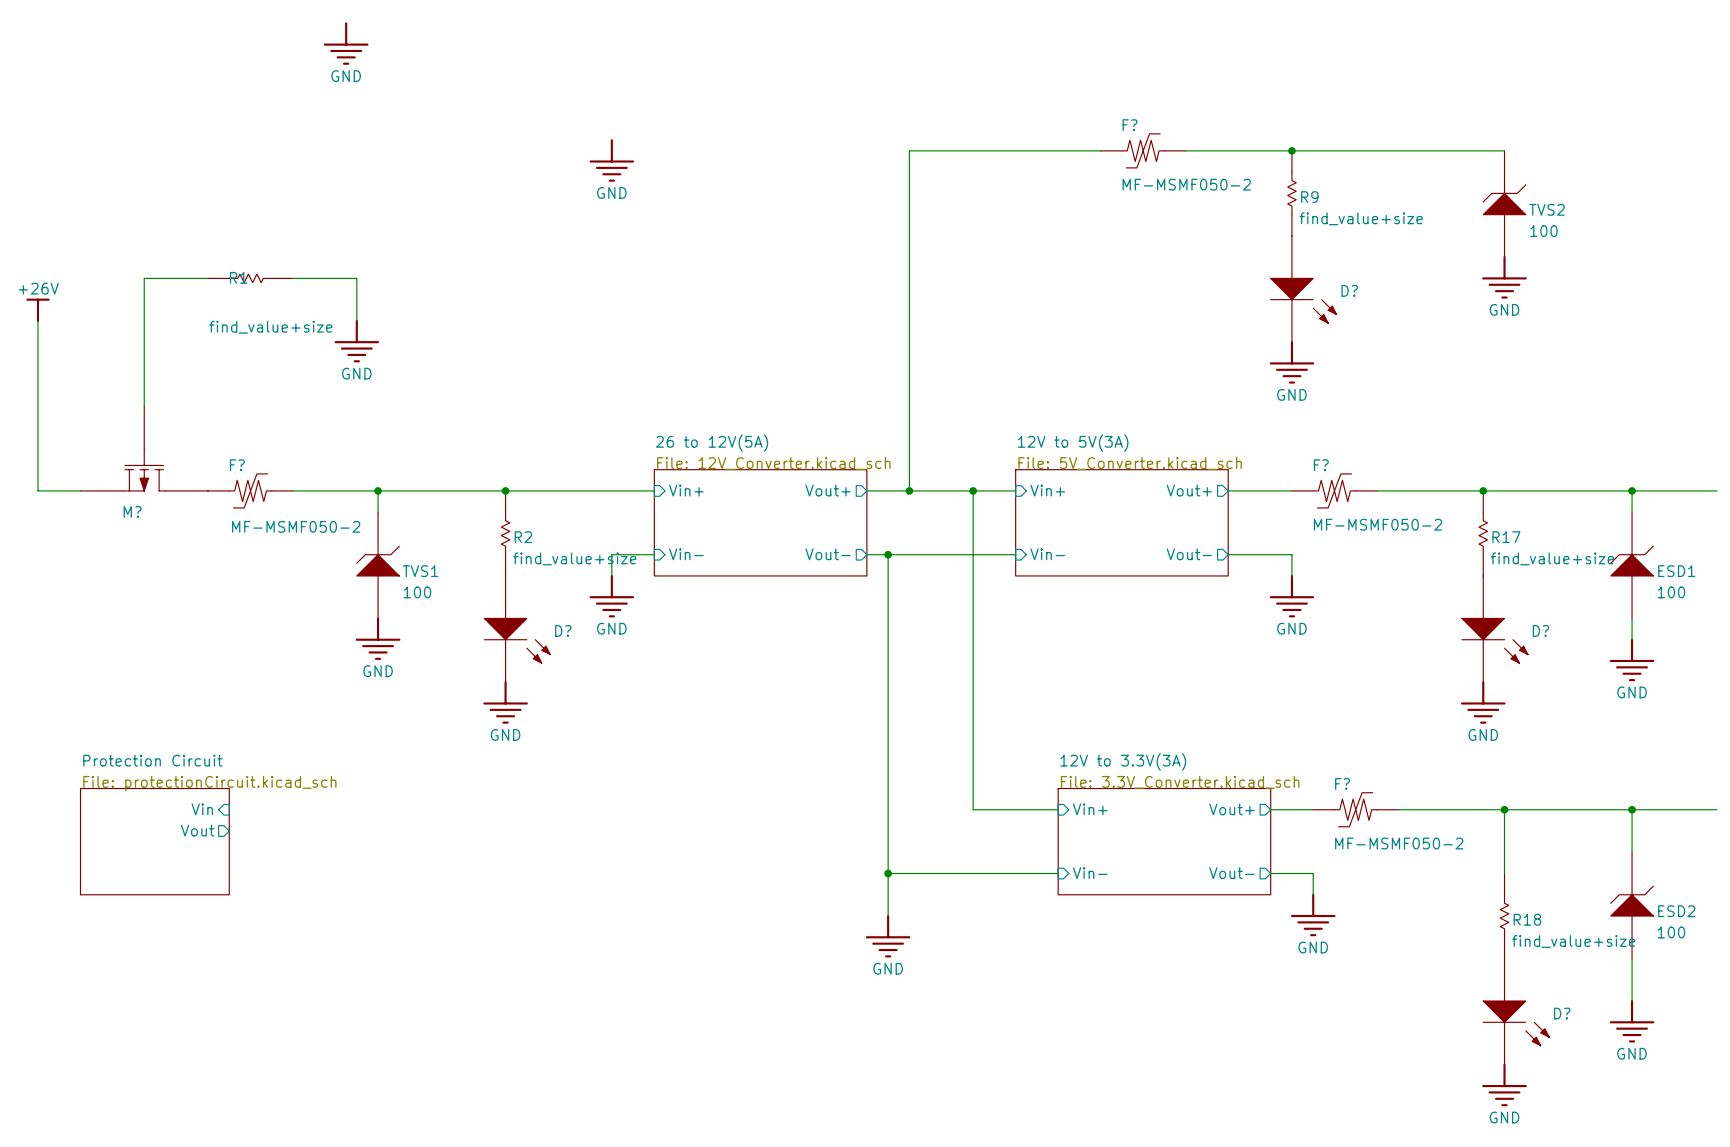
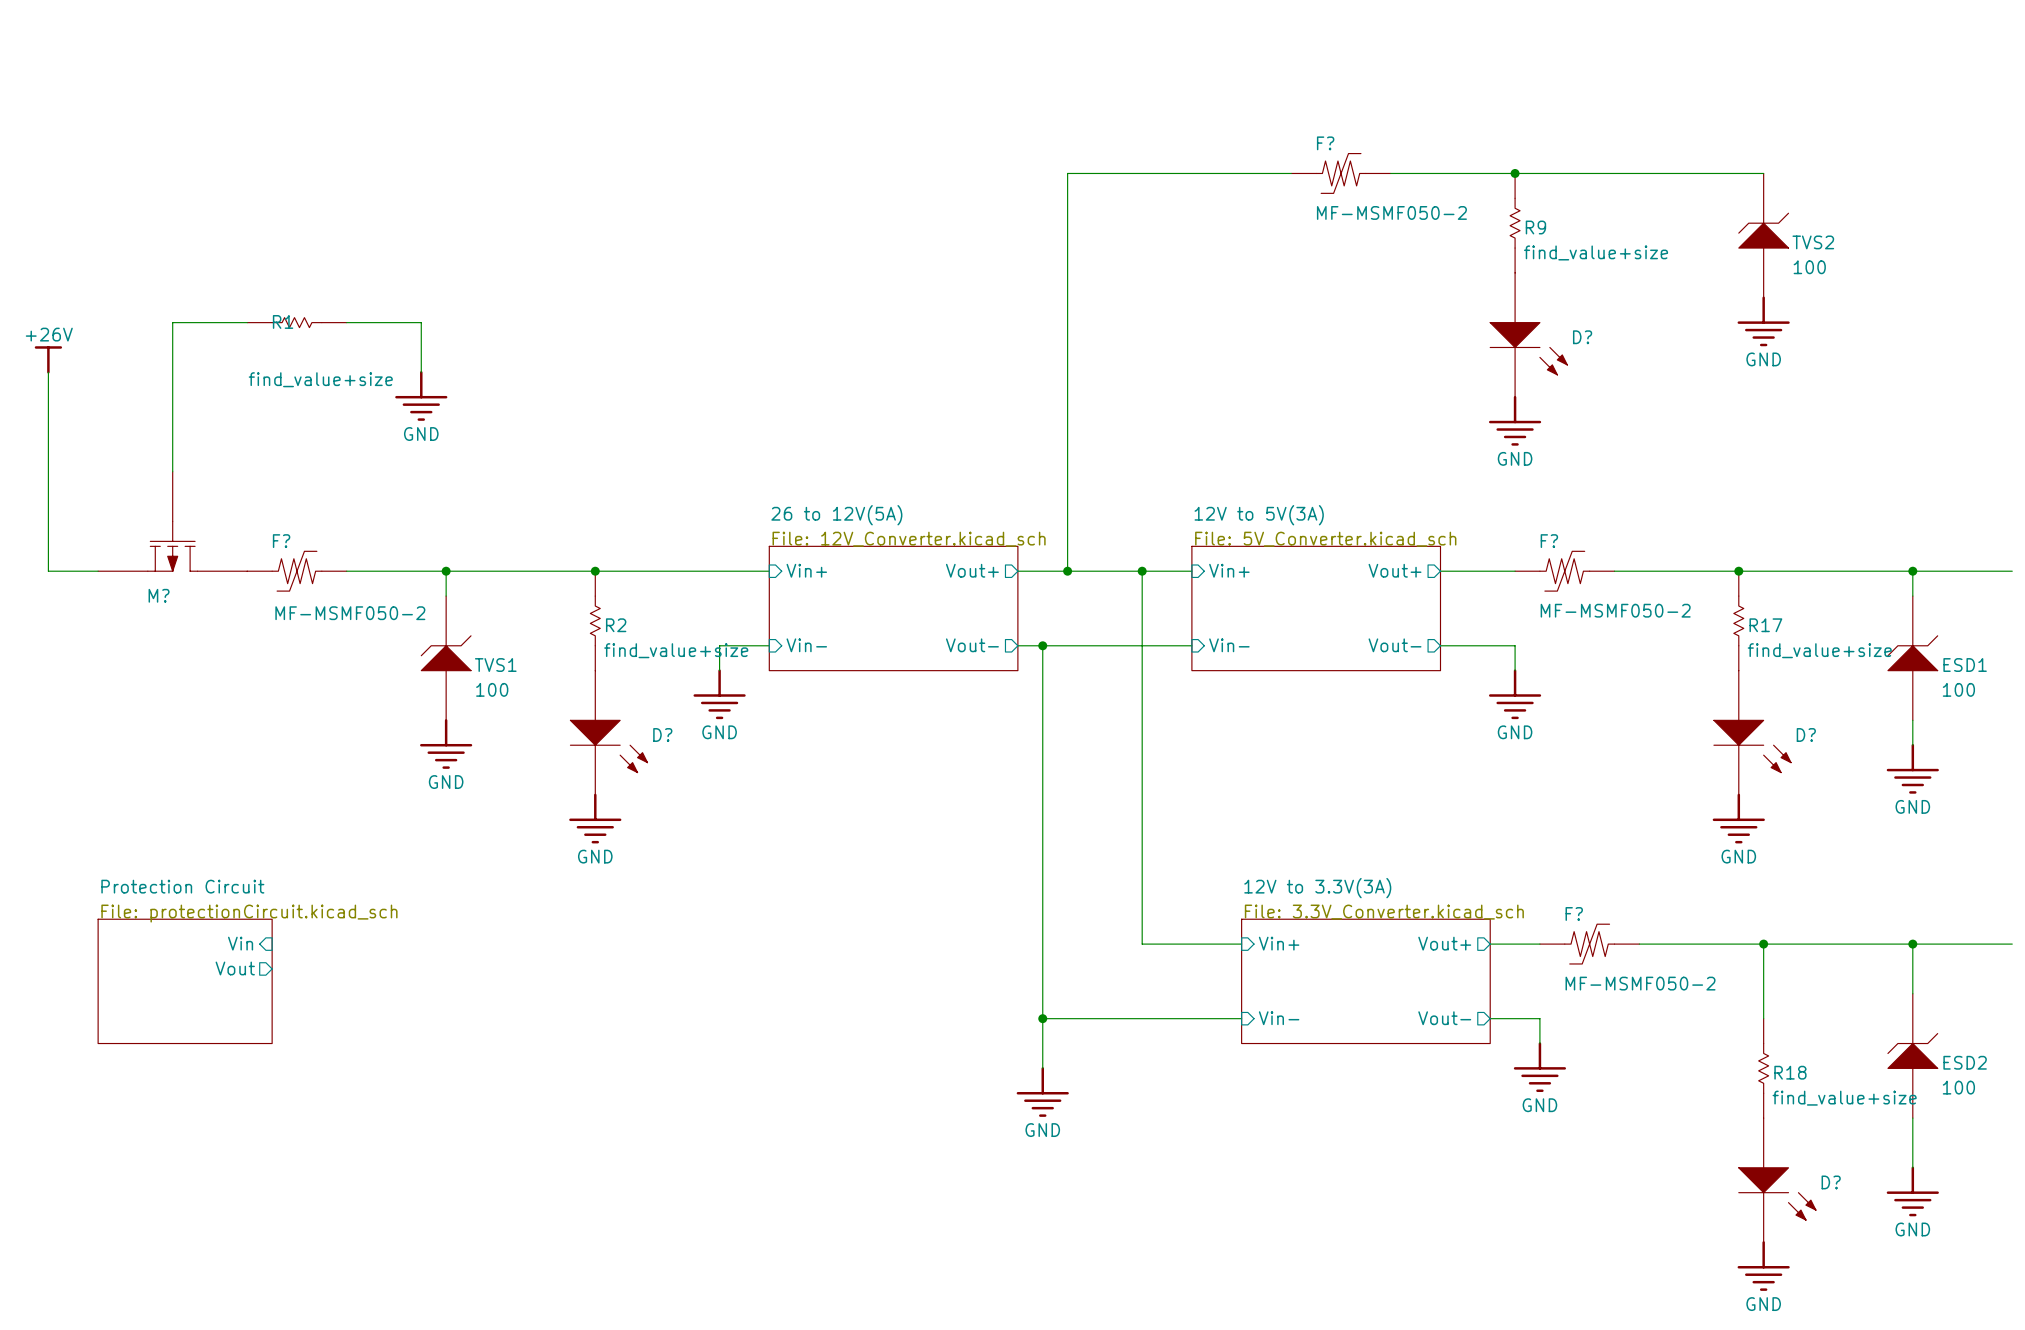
power symbol: GND (346, 43) -> none
power symbol: GND (611, 160) -> none

